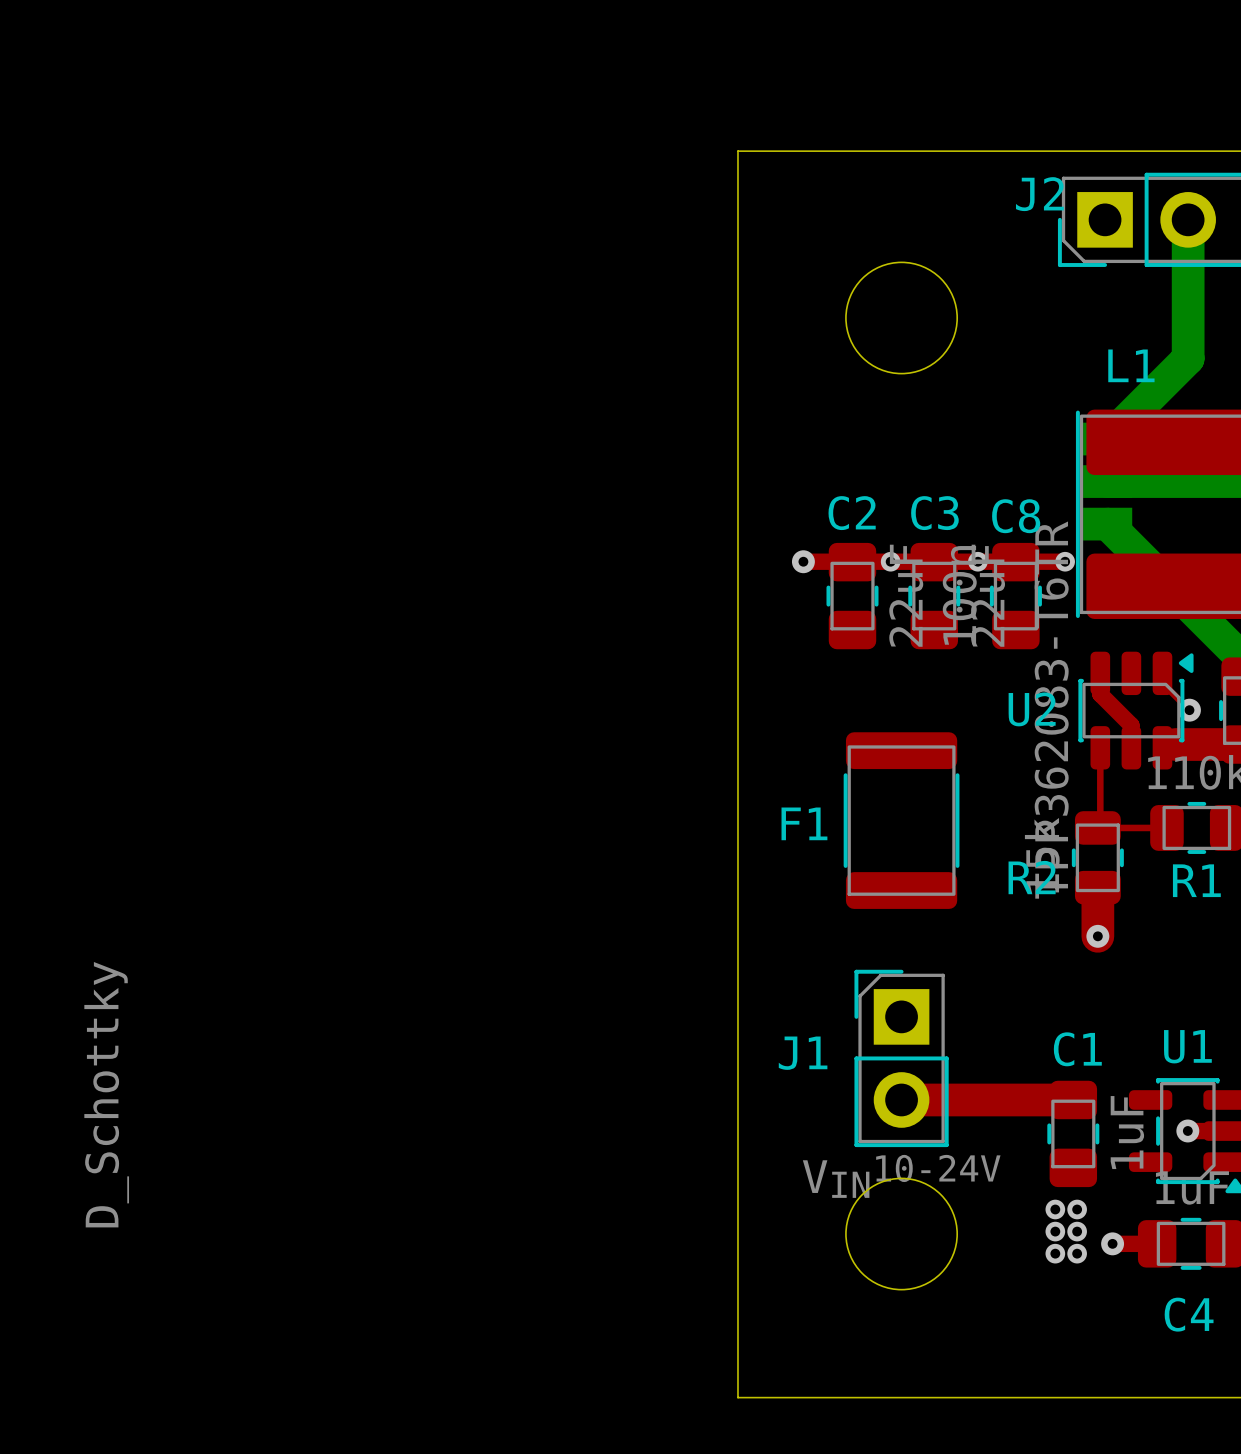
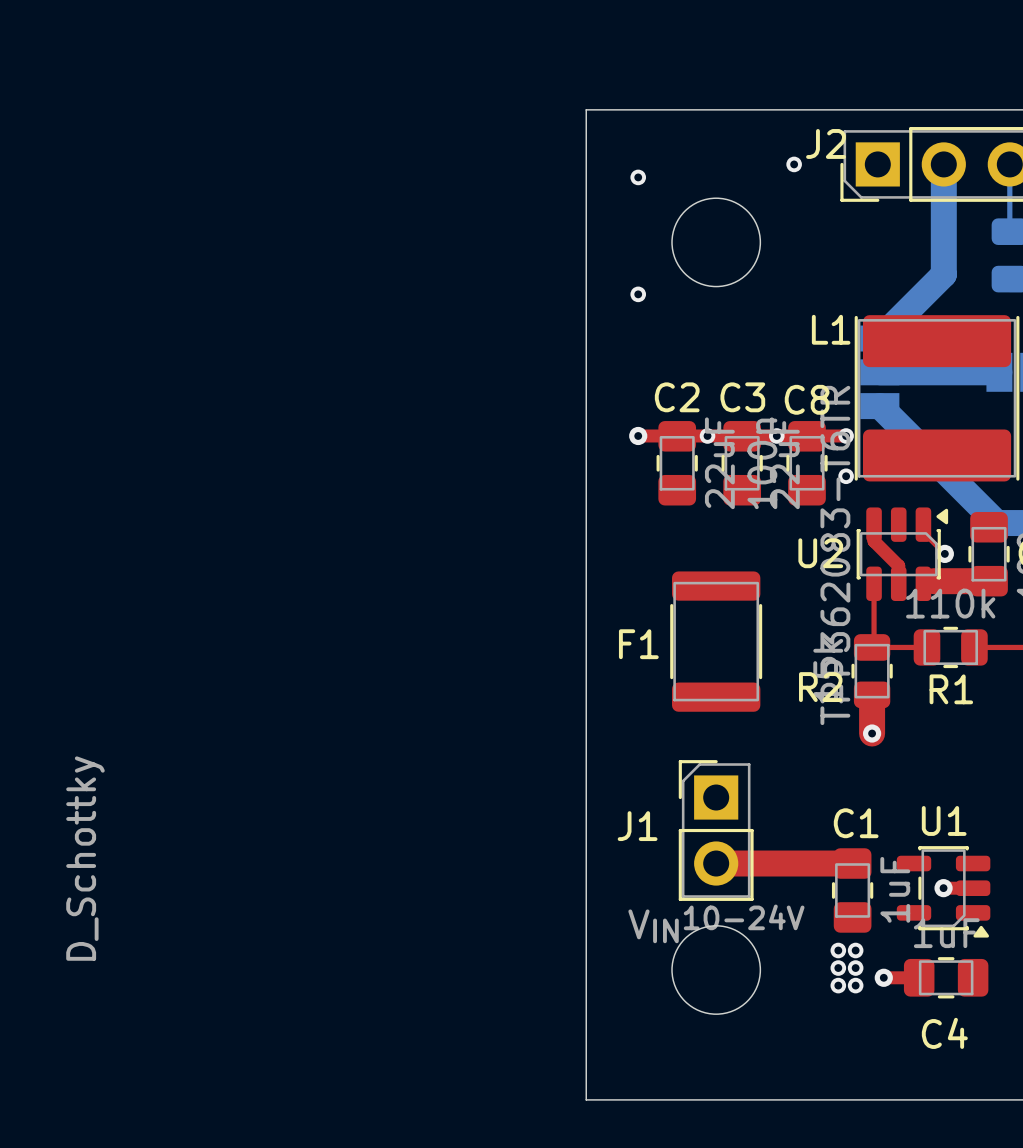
via: none -> (794, 164)
via: none -> (638, 177)
L1 name position: L1 (1131, 365) -> L1 (831, 329)
via: none -> (638, 294)
via: none -> (846, 476)

